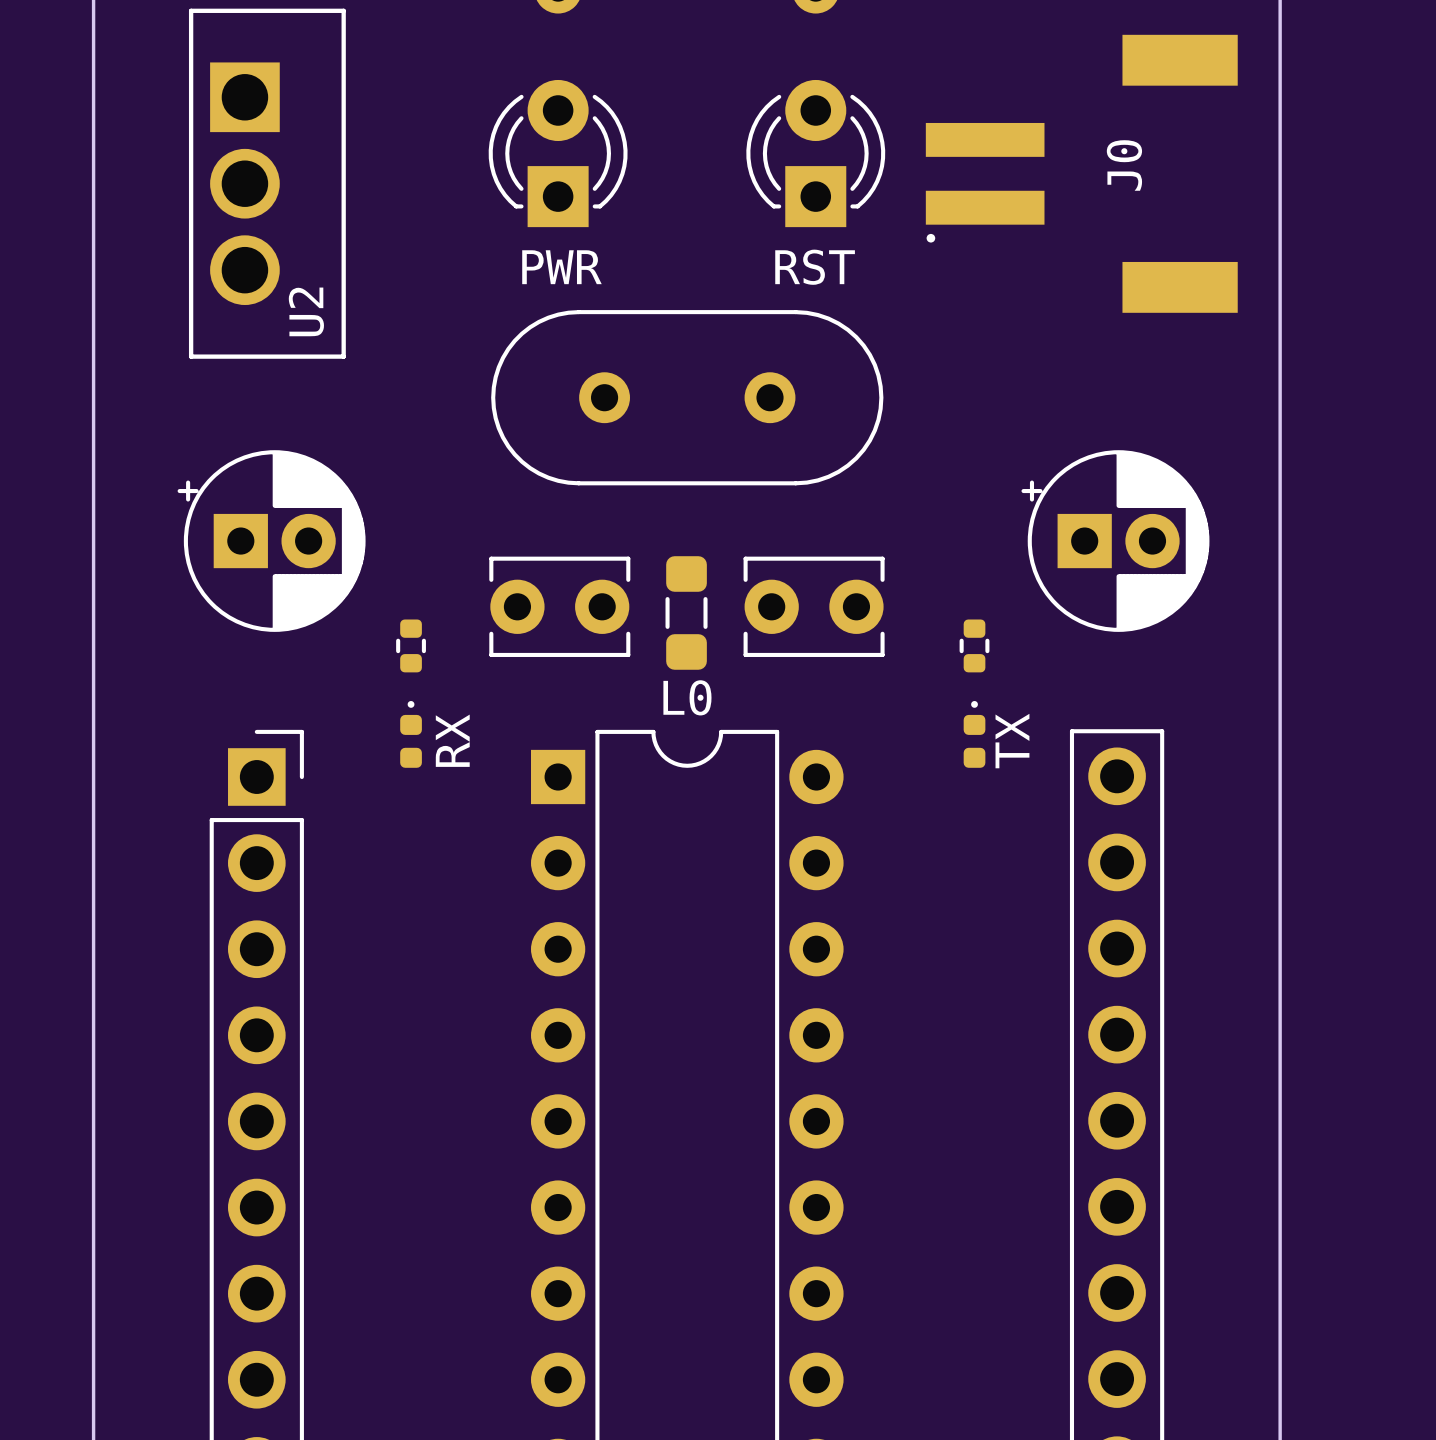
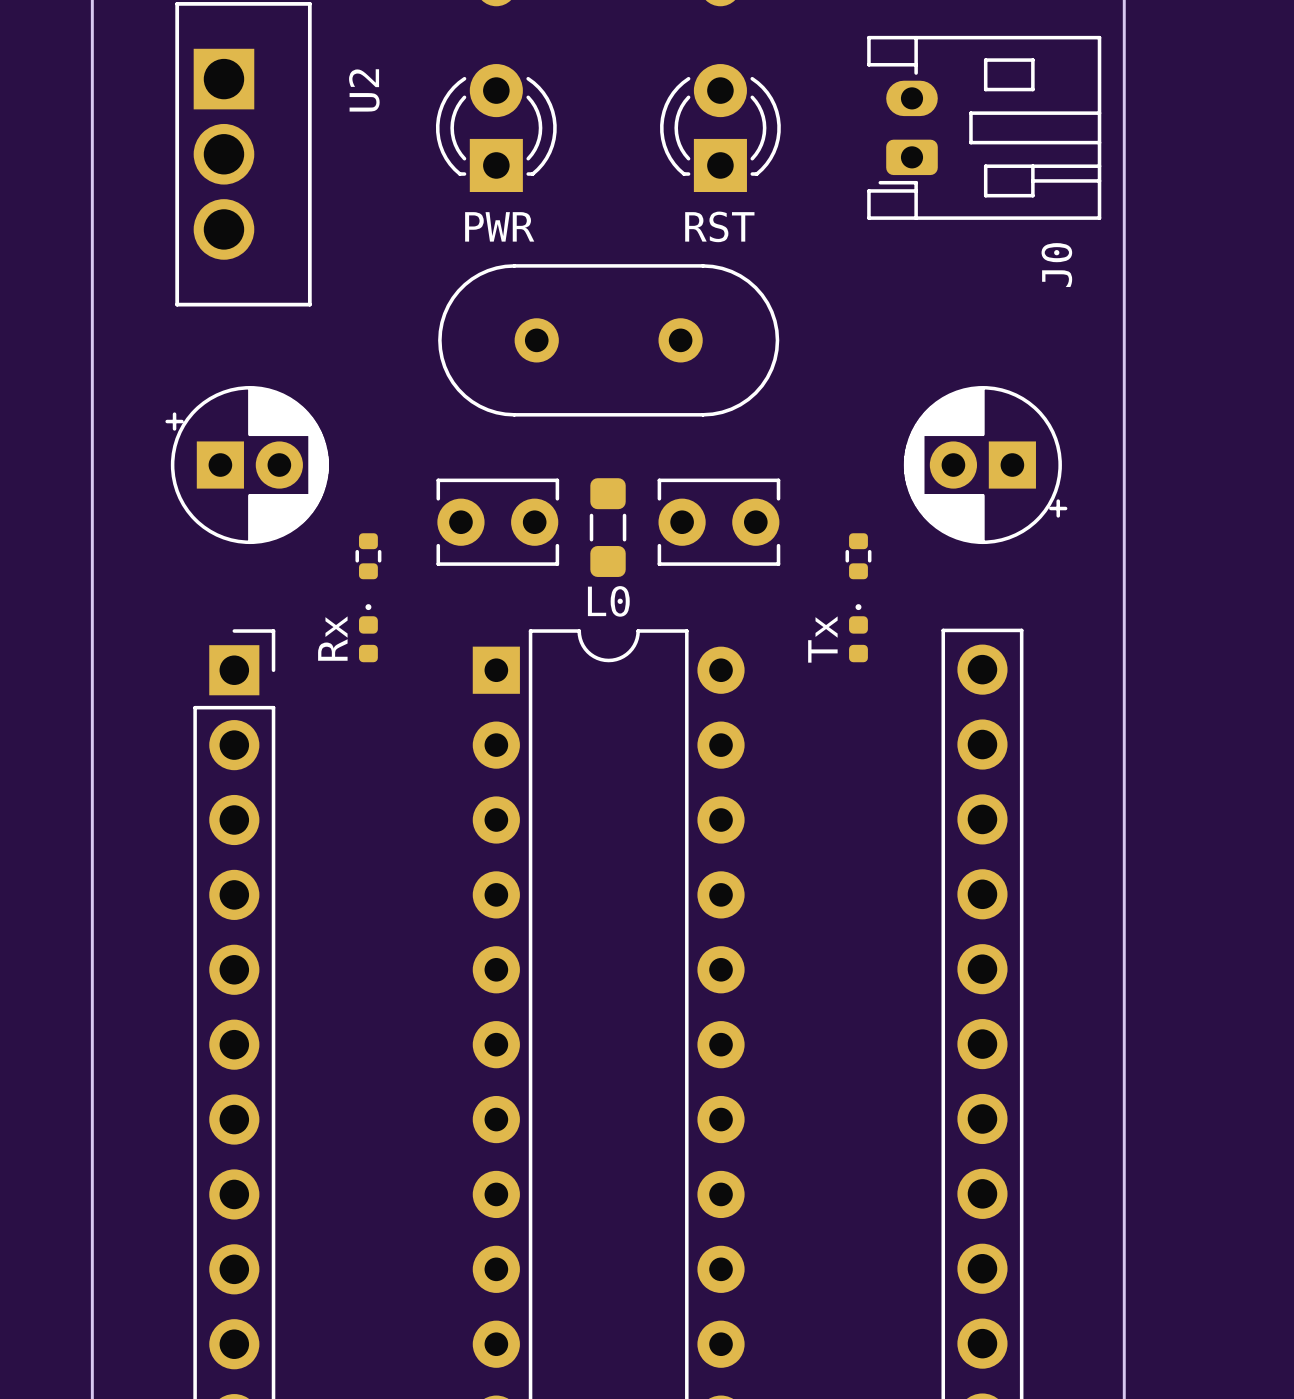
J0 footprint: [925, 34, 1238, 313] -> [867, 35, 1102, 220]
J0 name position: J0 (1124, 165) -> J0 (1056, 265)
U2 name position: U2 (306, 311) -> U2 (364, 90)
part rotation: 0° (1115, 541) -> 180° (985, 465)
part value: RX (452, 740) -> Rx (332, 638)
part value: TX (1012, 741) -> Tx (822, 639)

